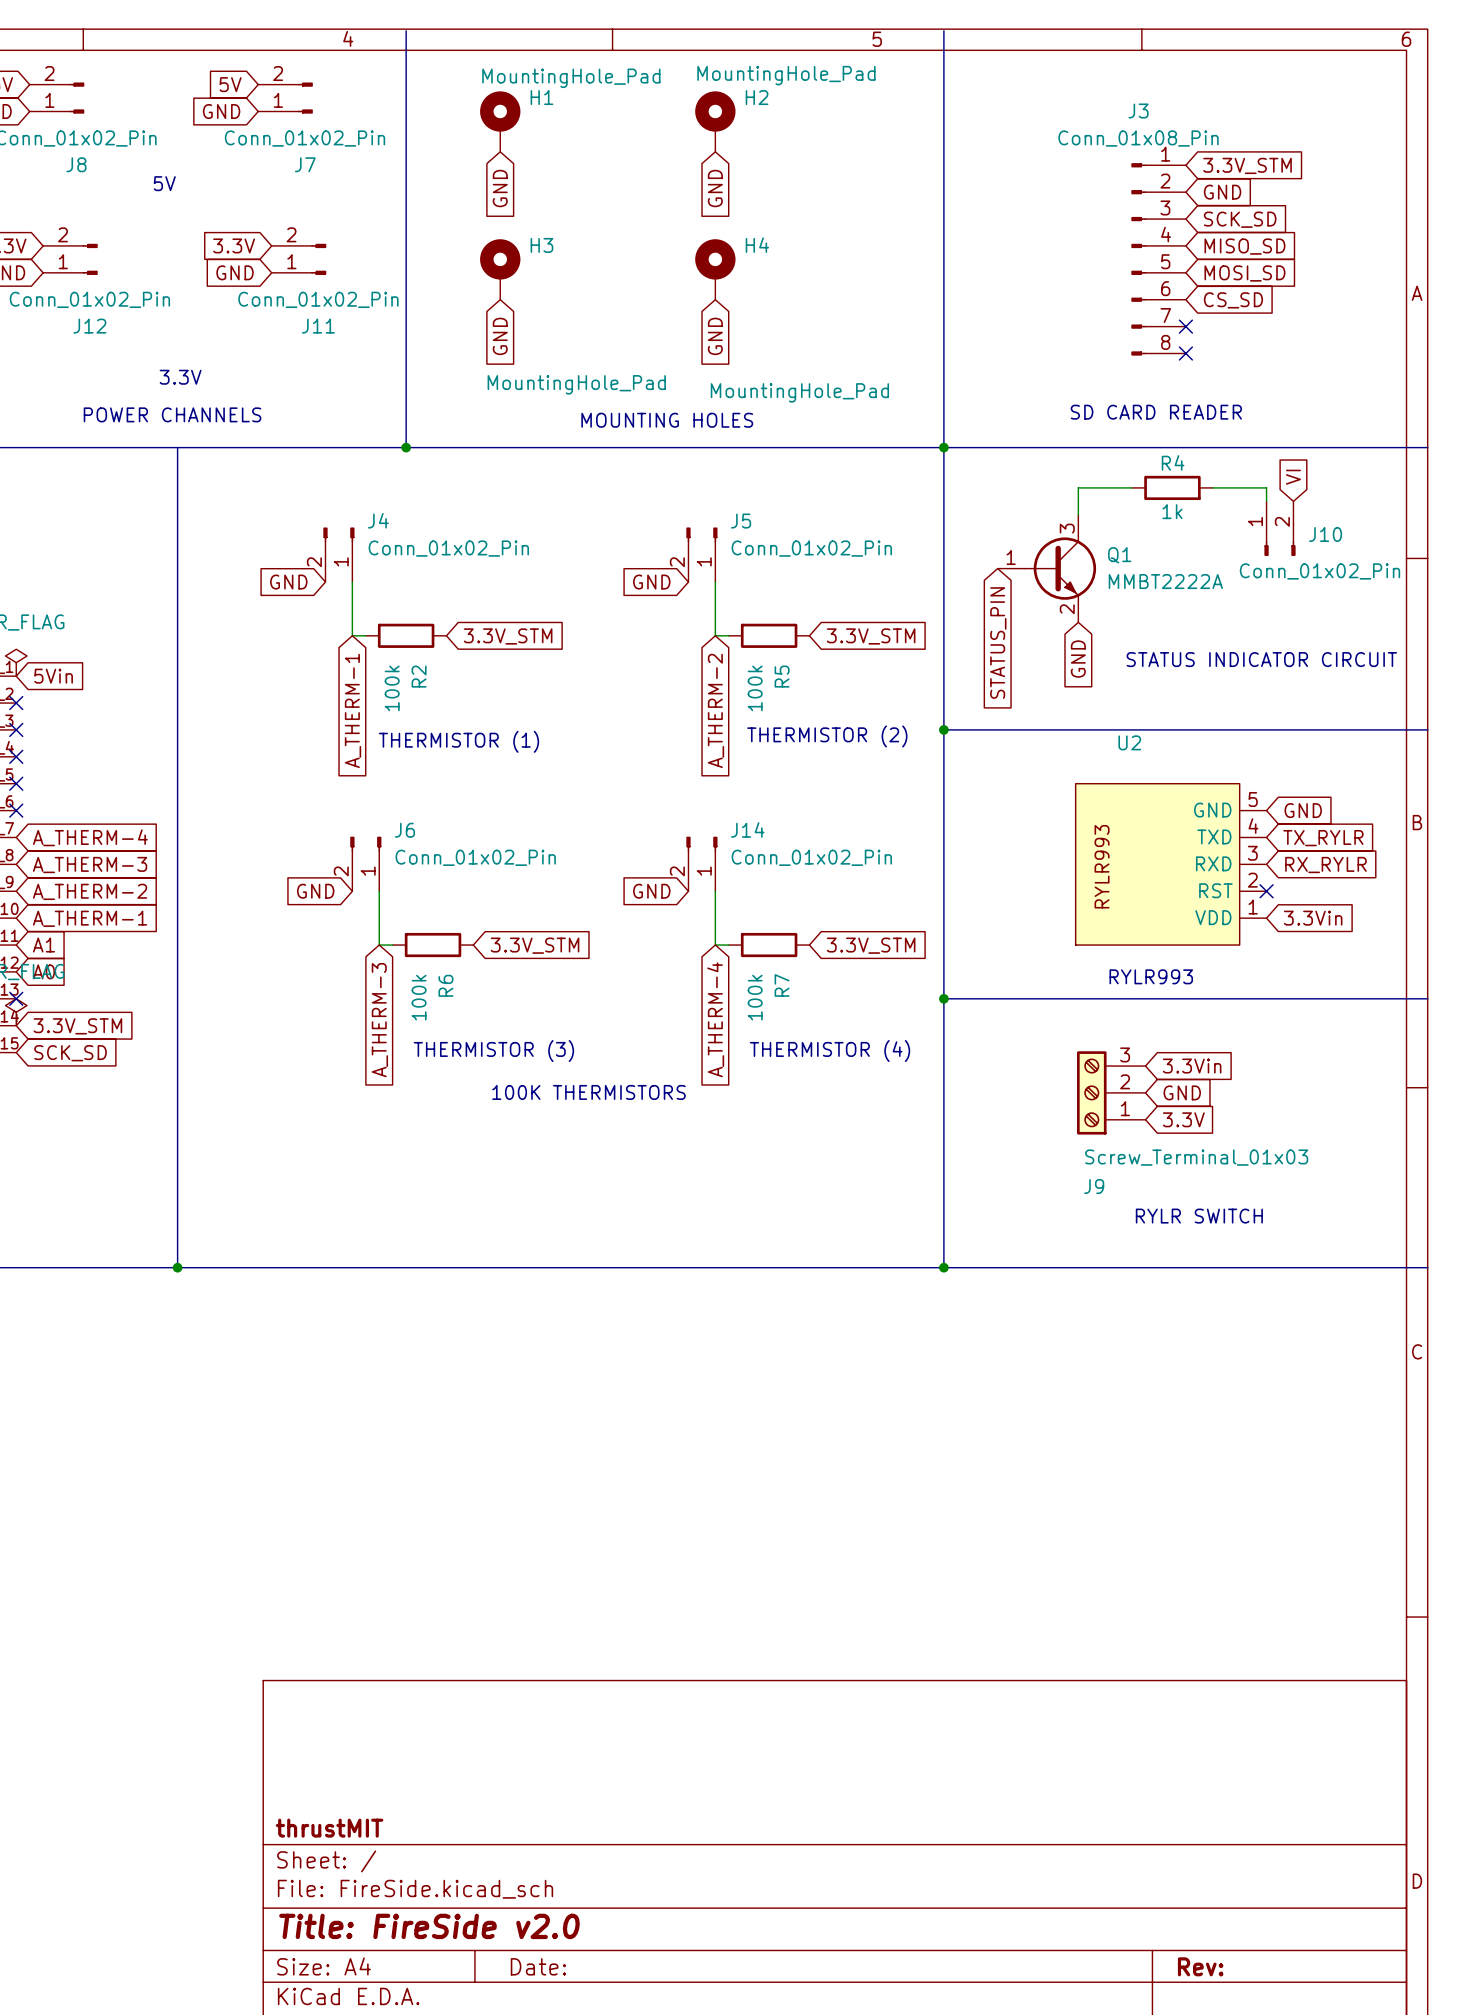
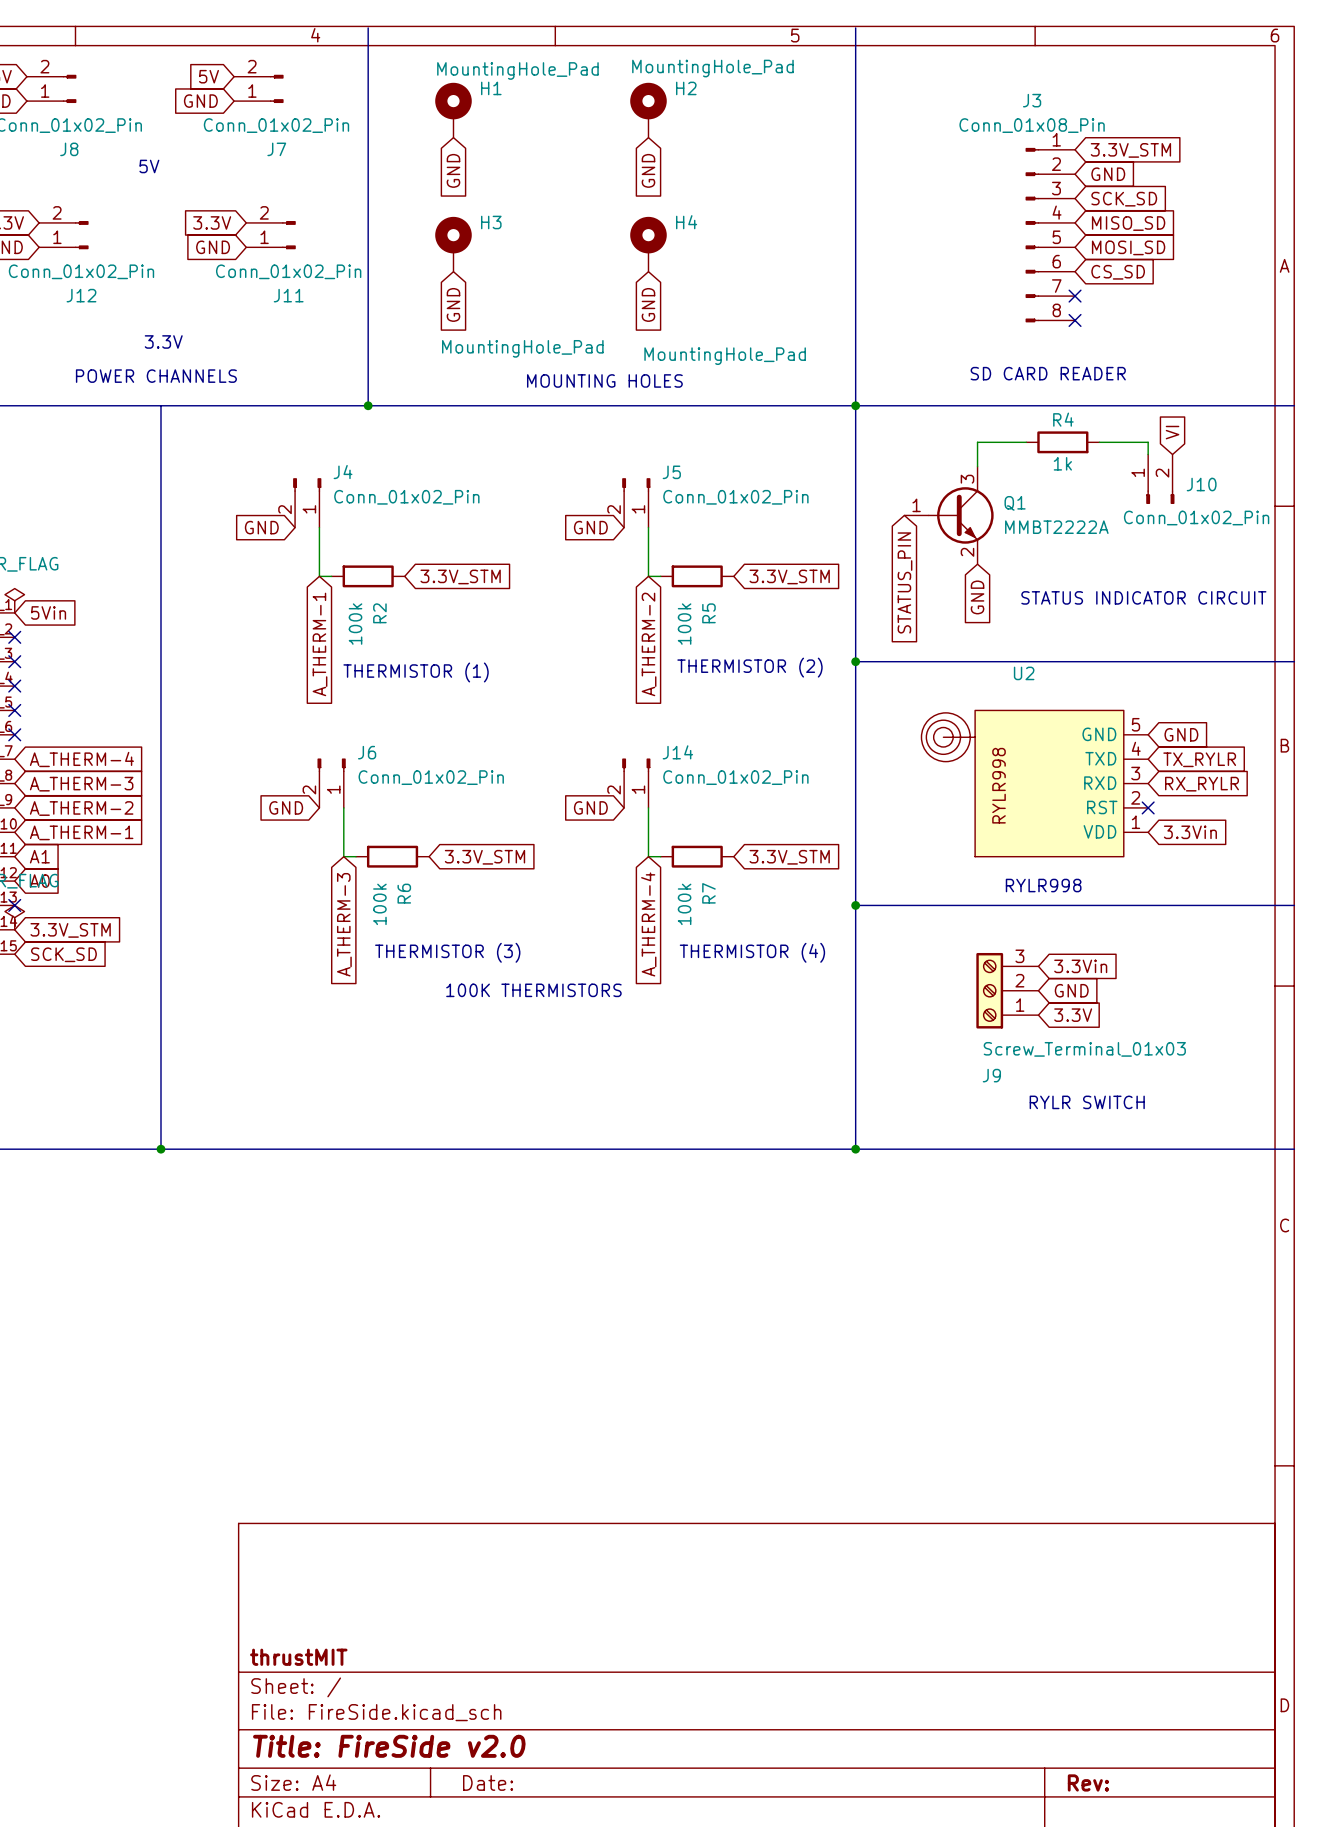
U2 symbol: [1075, 783, 1267, 946] -> [921, 710, 1149, 857]
text: RYLR993 (1151, 976) -> RYLR998 (1043, 885)

